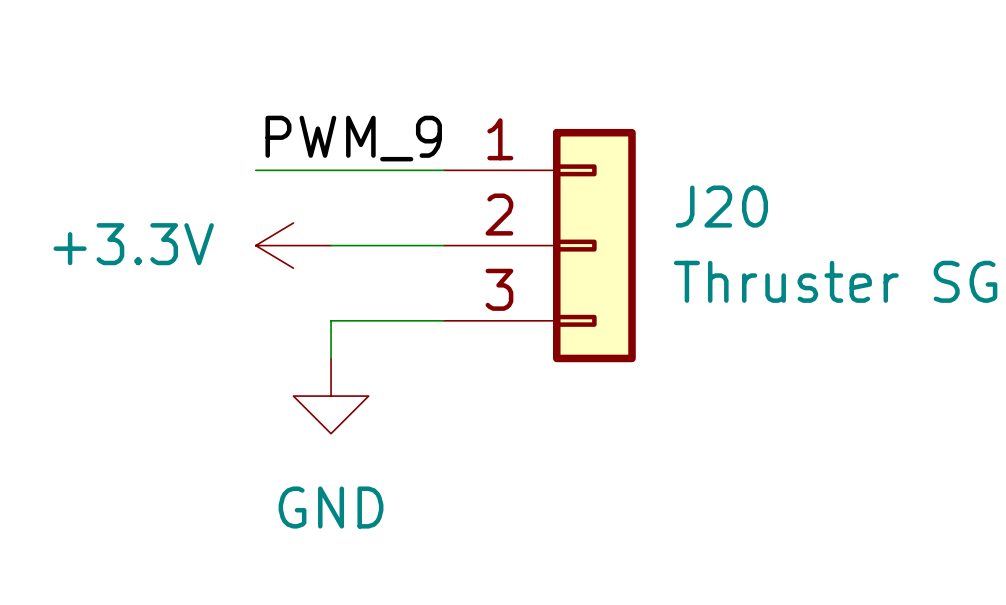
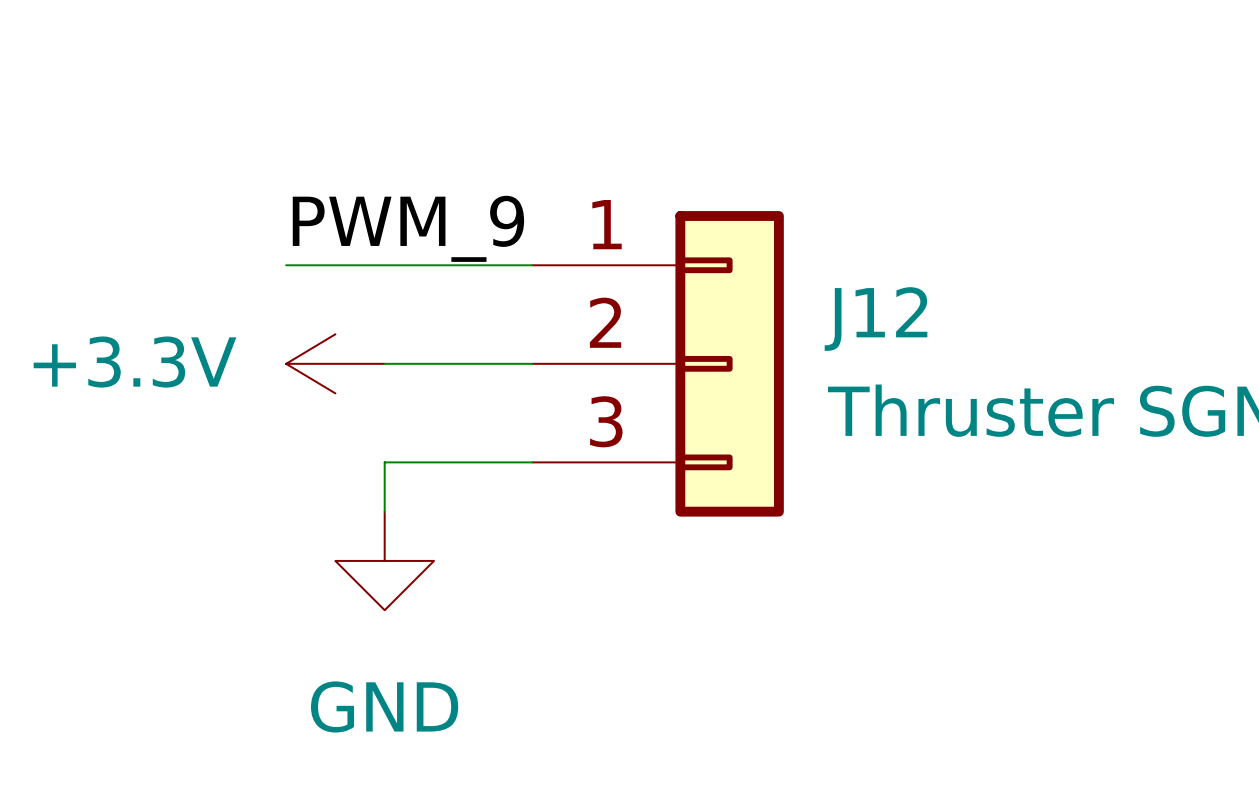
J20 name: J20 (721, 206) -> J12 (876, 319)

